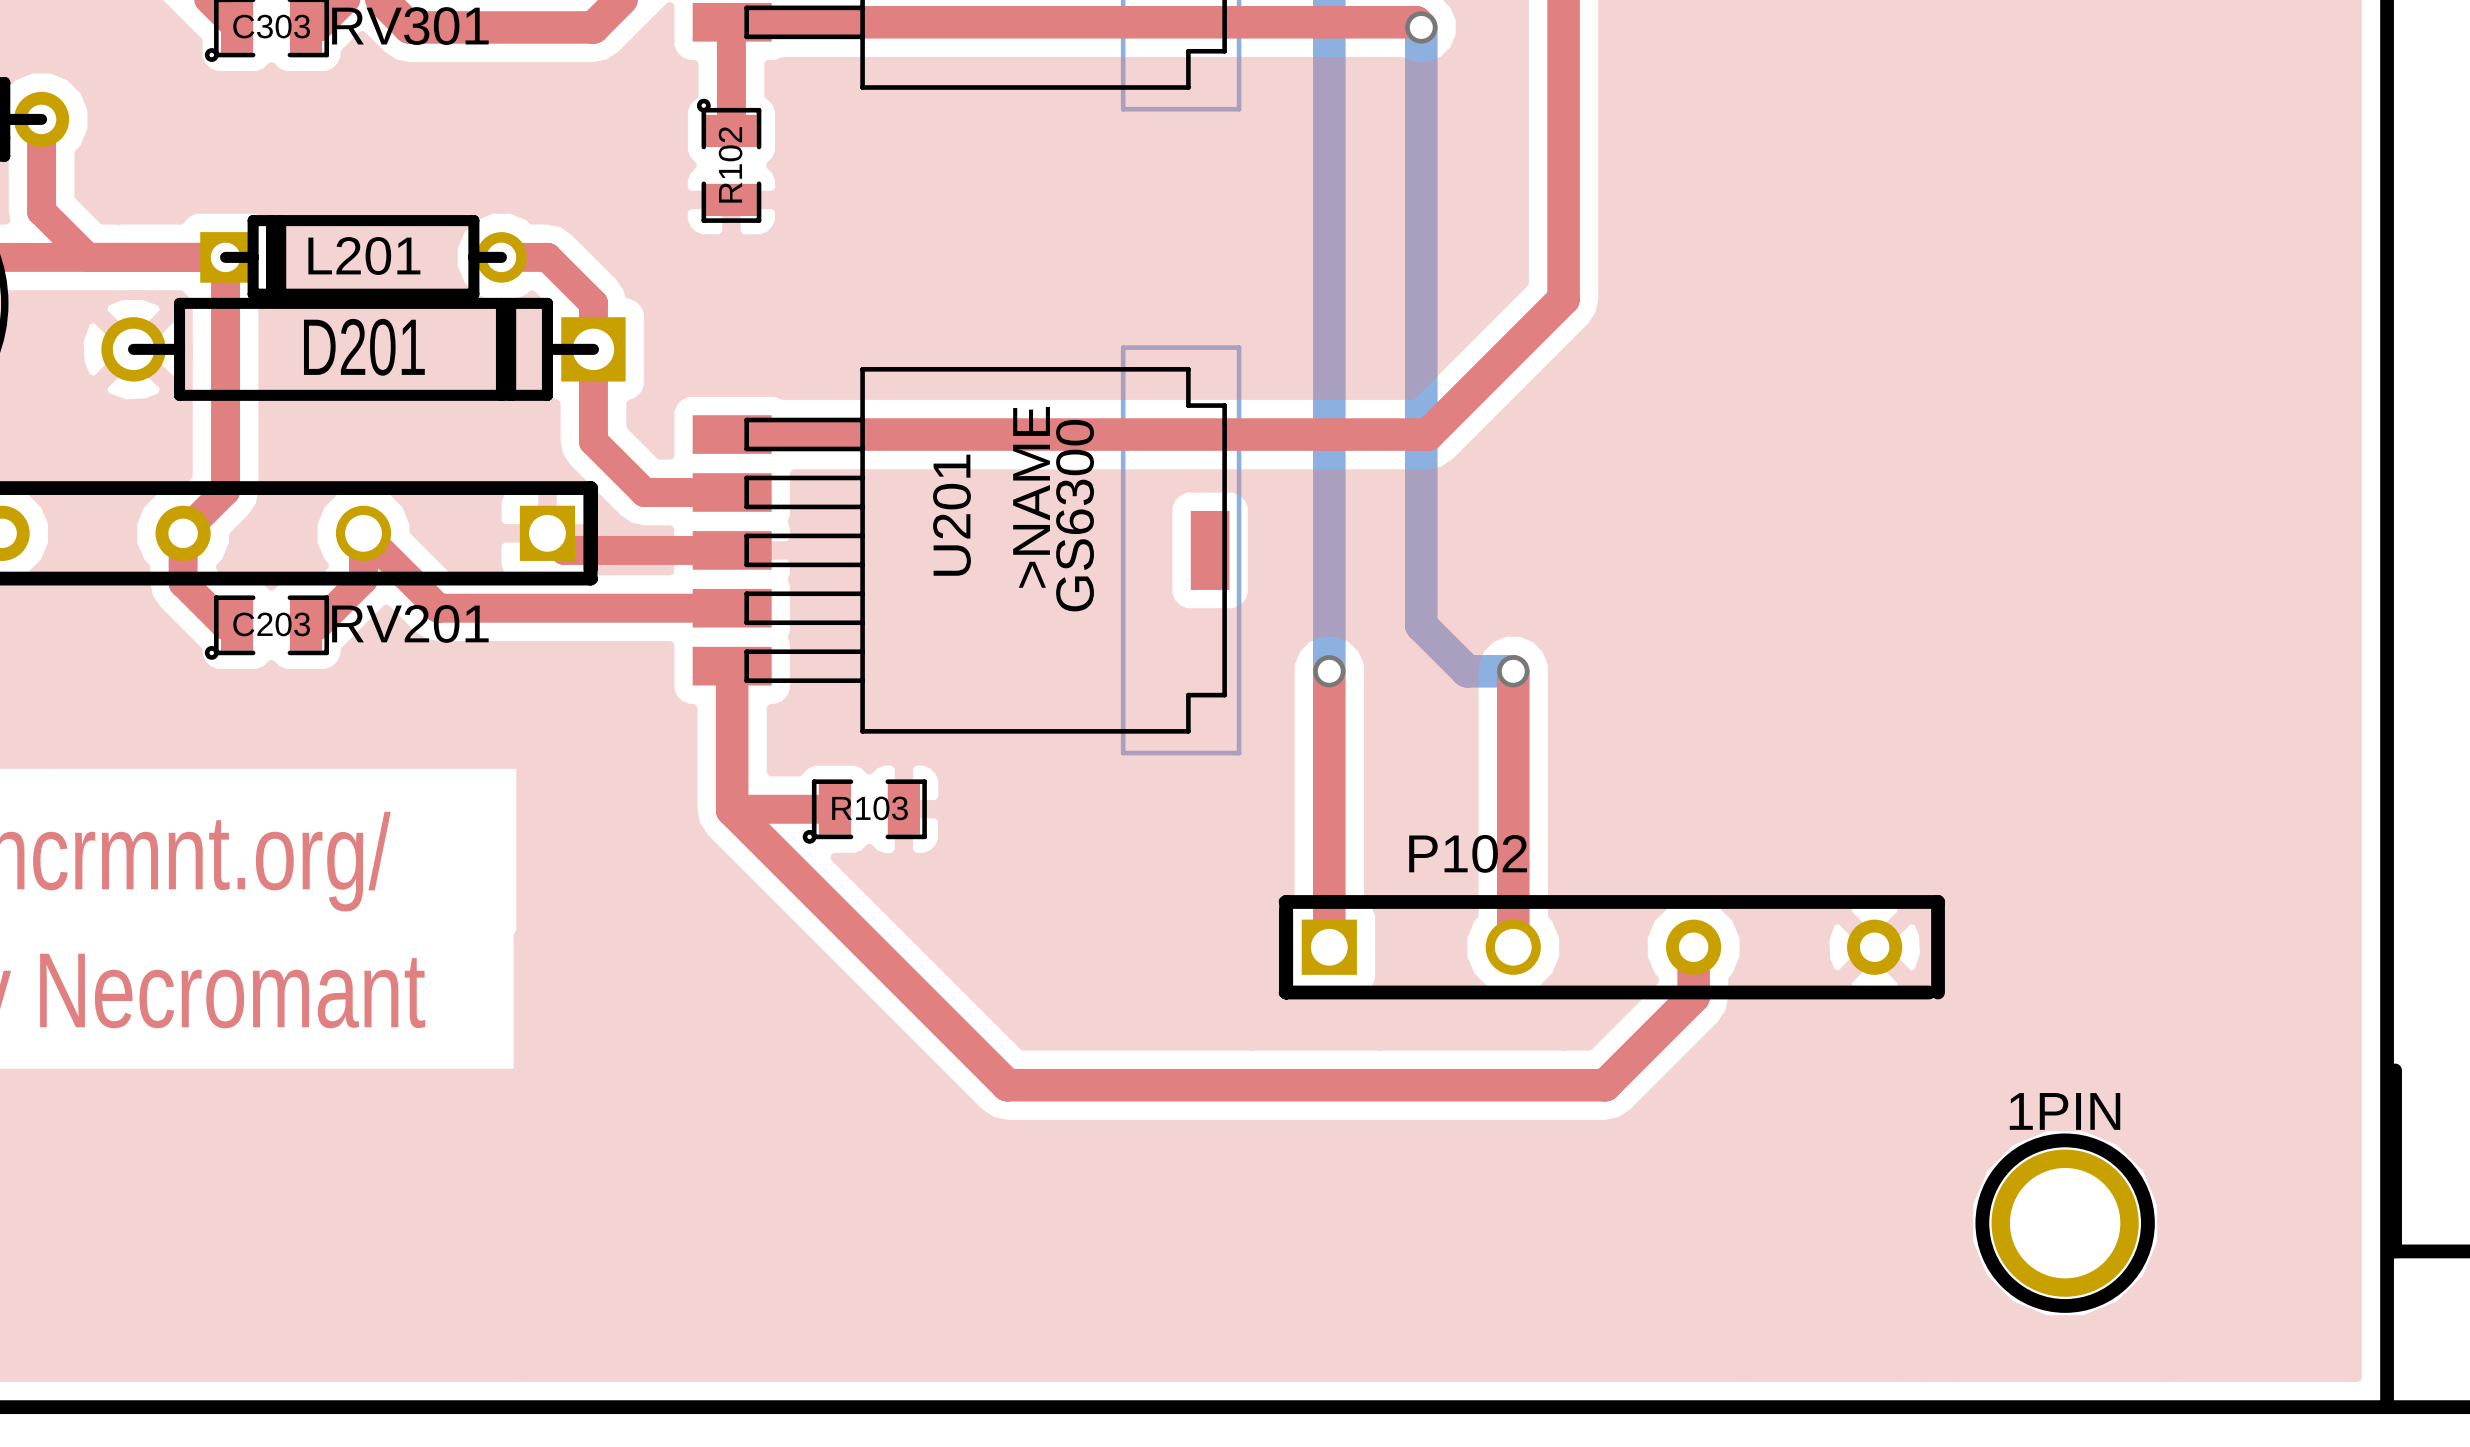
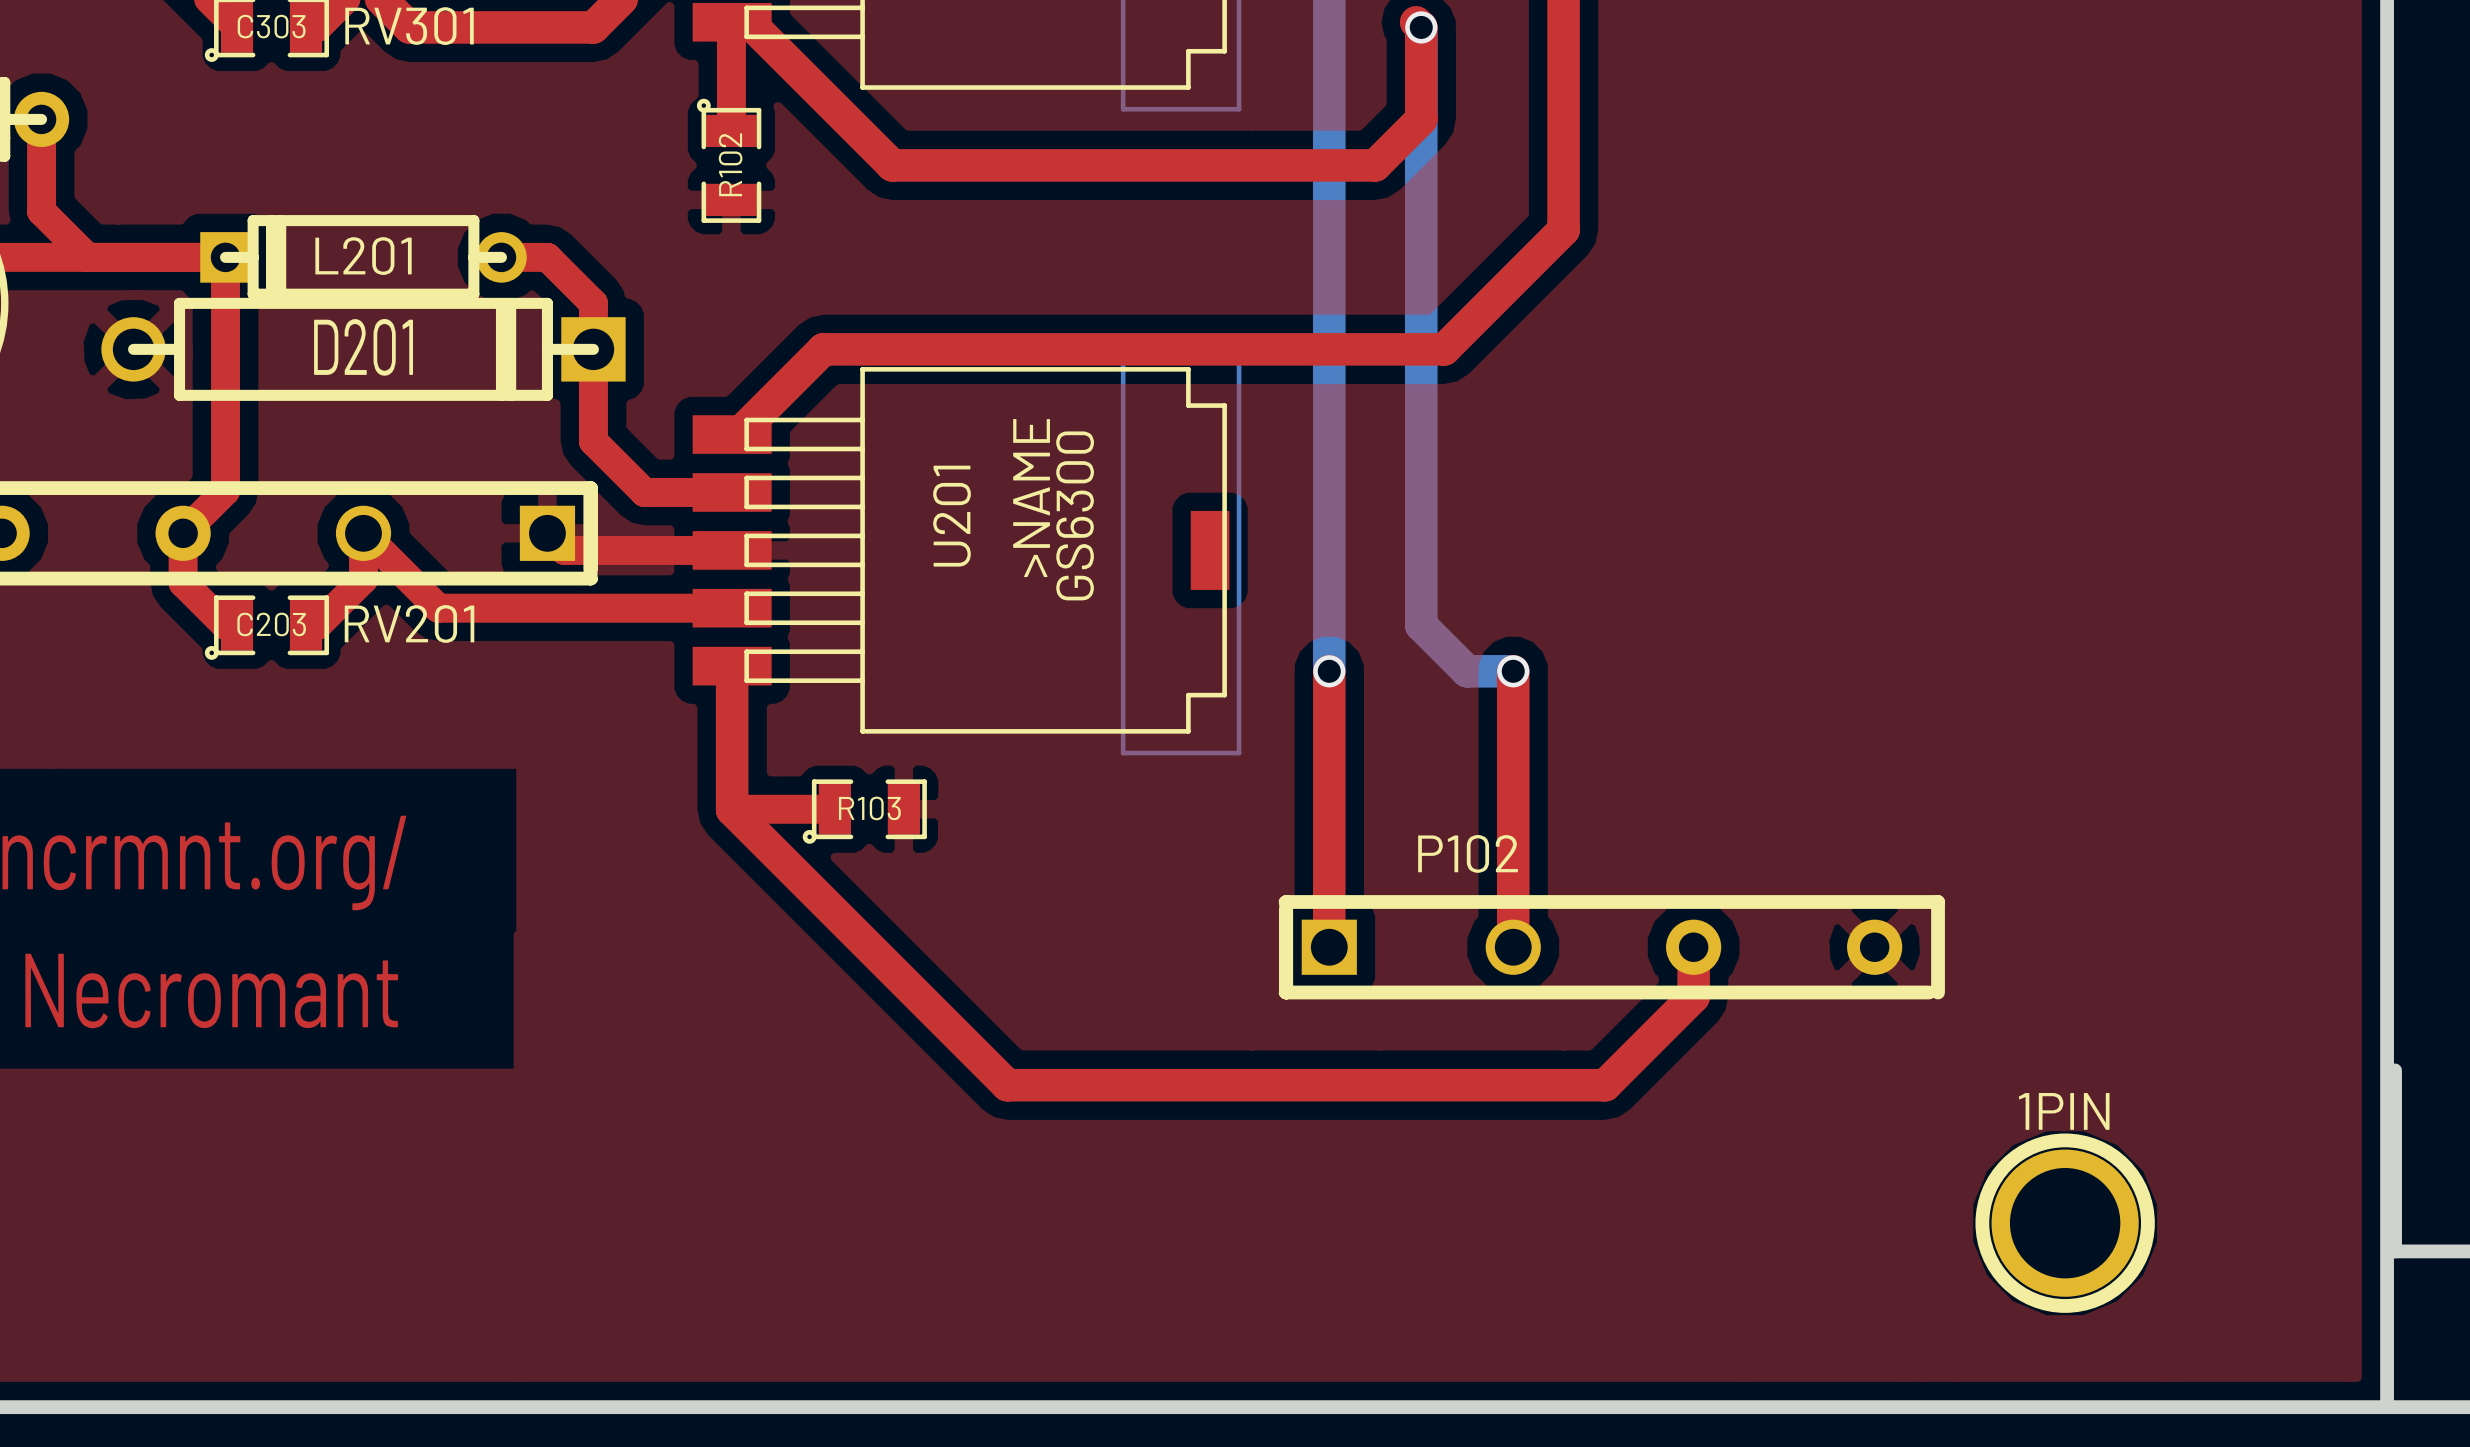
top track: (749, 22) (1416, 22) -> (749, 22) (892, 165) (1375, 165) (1421, 119) (1421, 27)
top track: (1563, 230) (1563, 299) (1428, 434) (738, 434) -> (1563, 230) (1444, 349) (823, 349) (738, 434)

